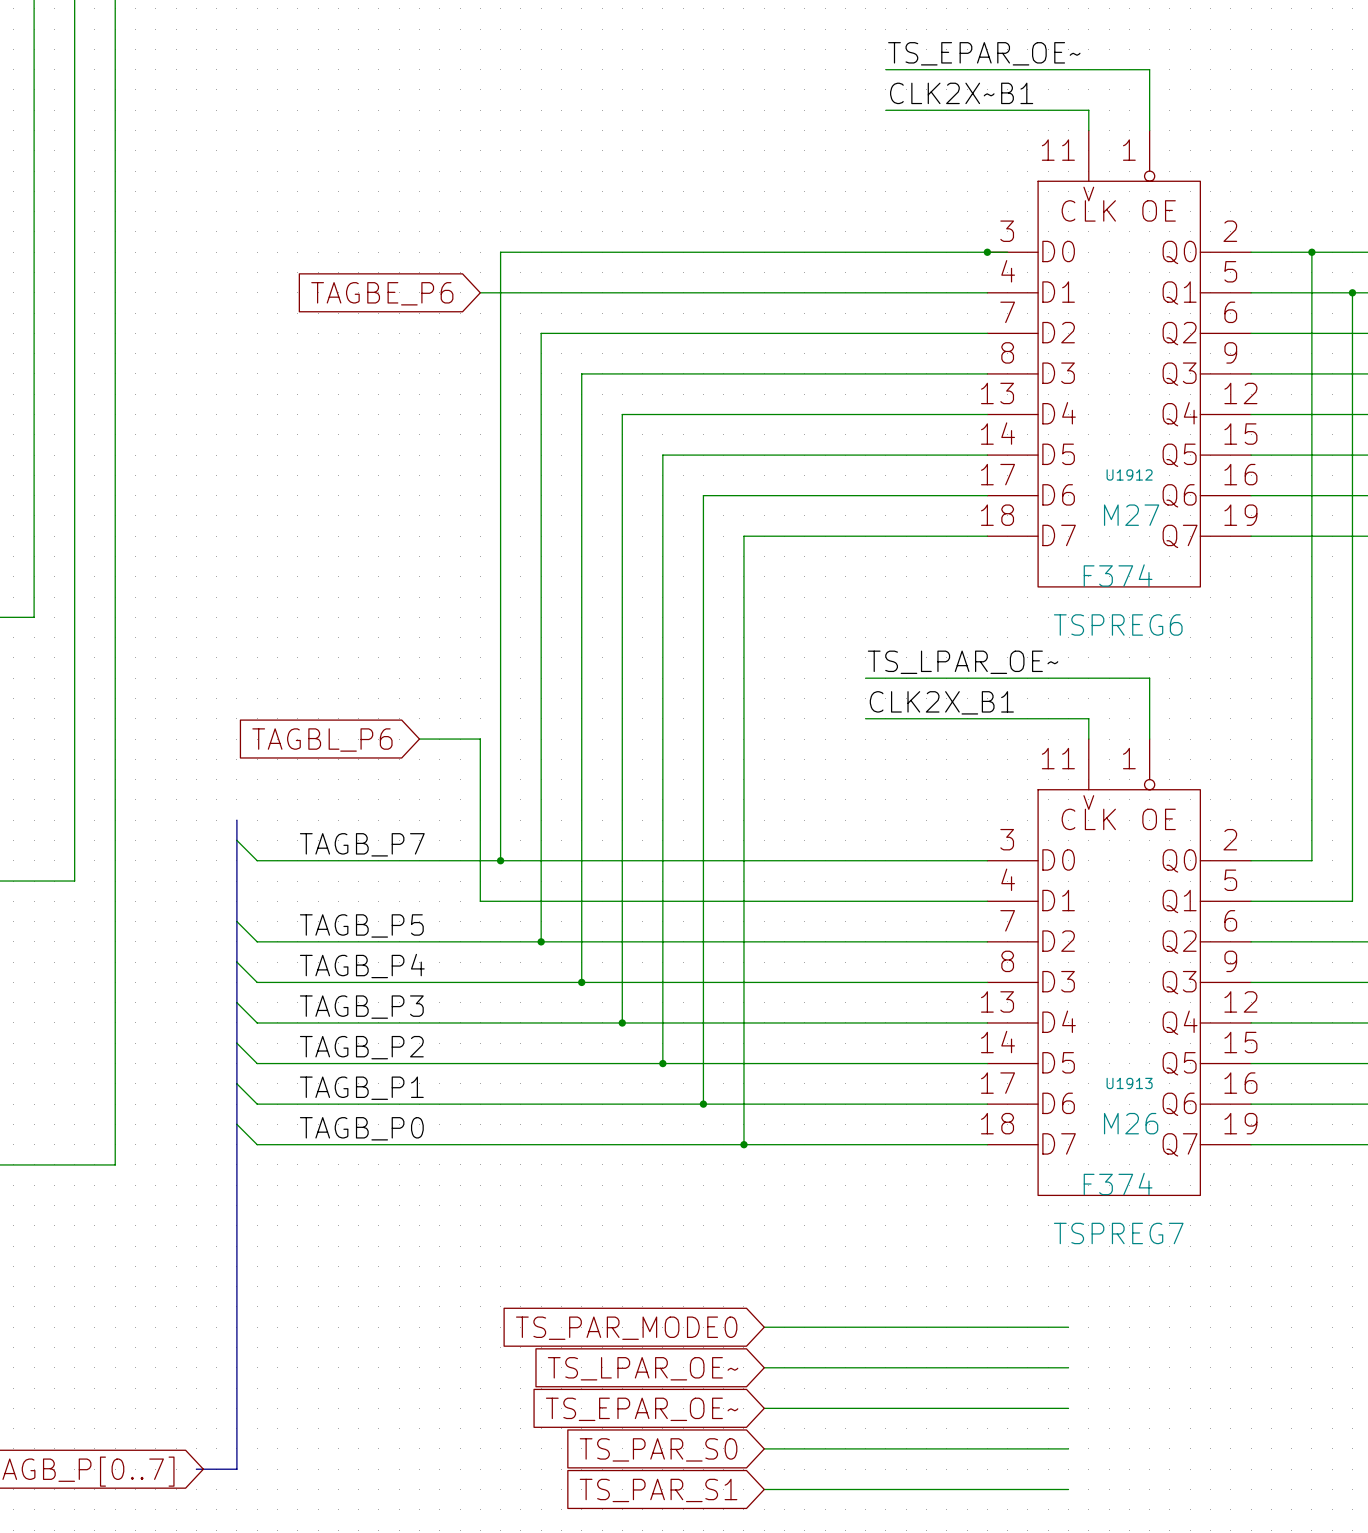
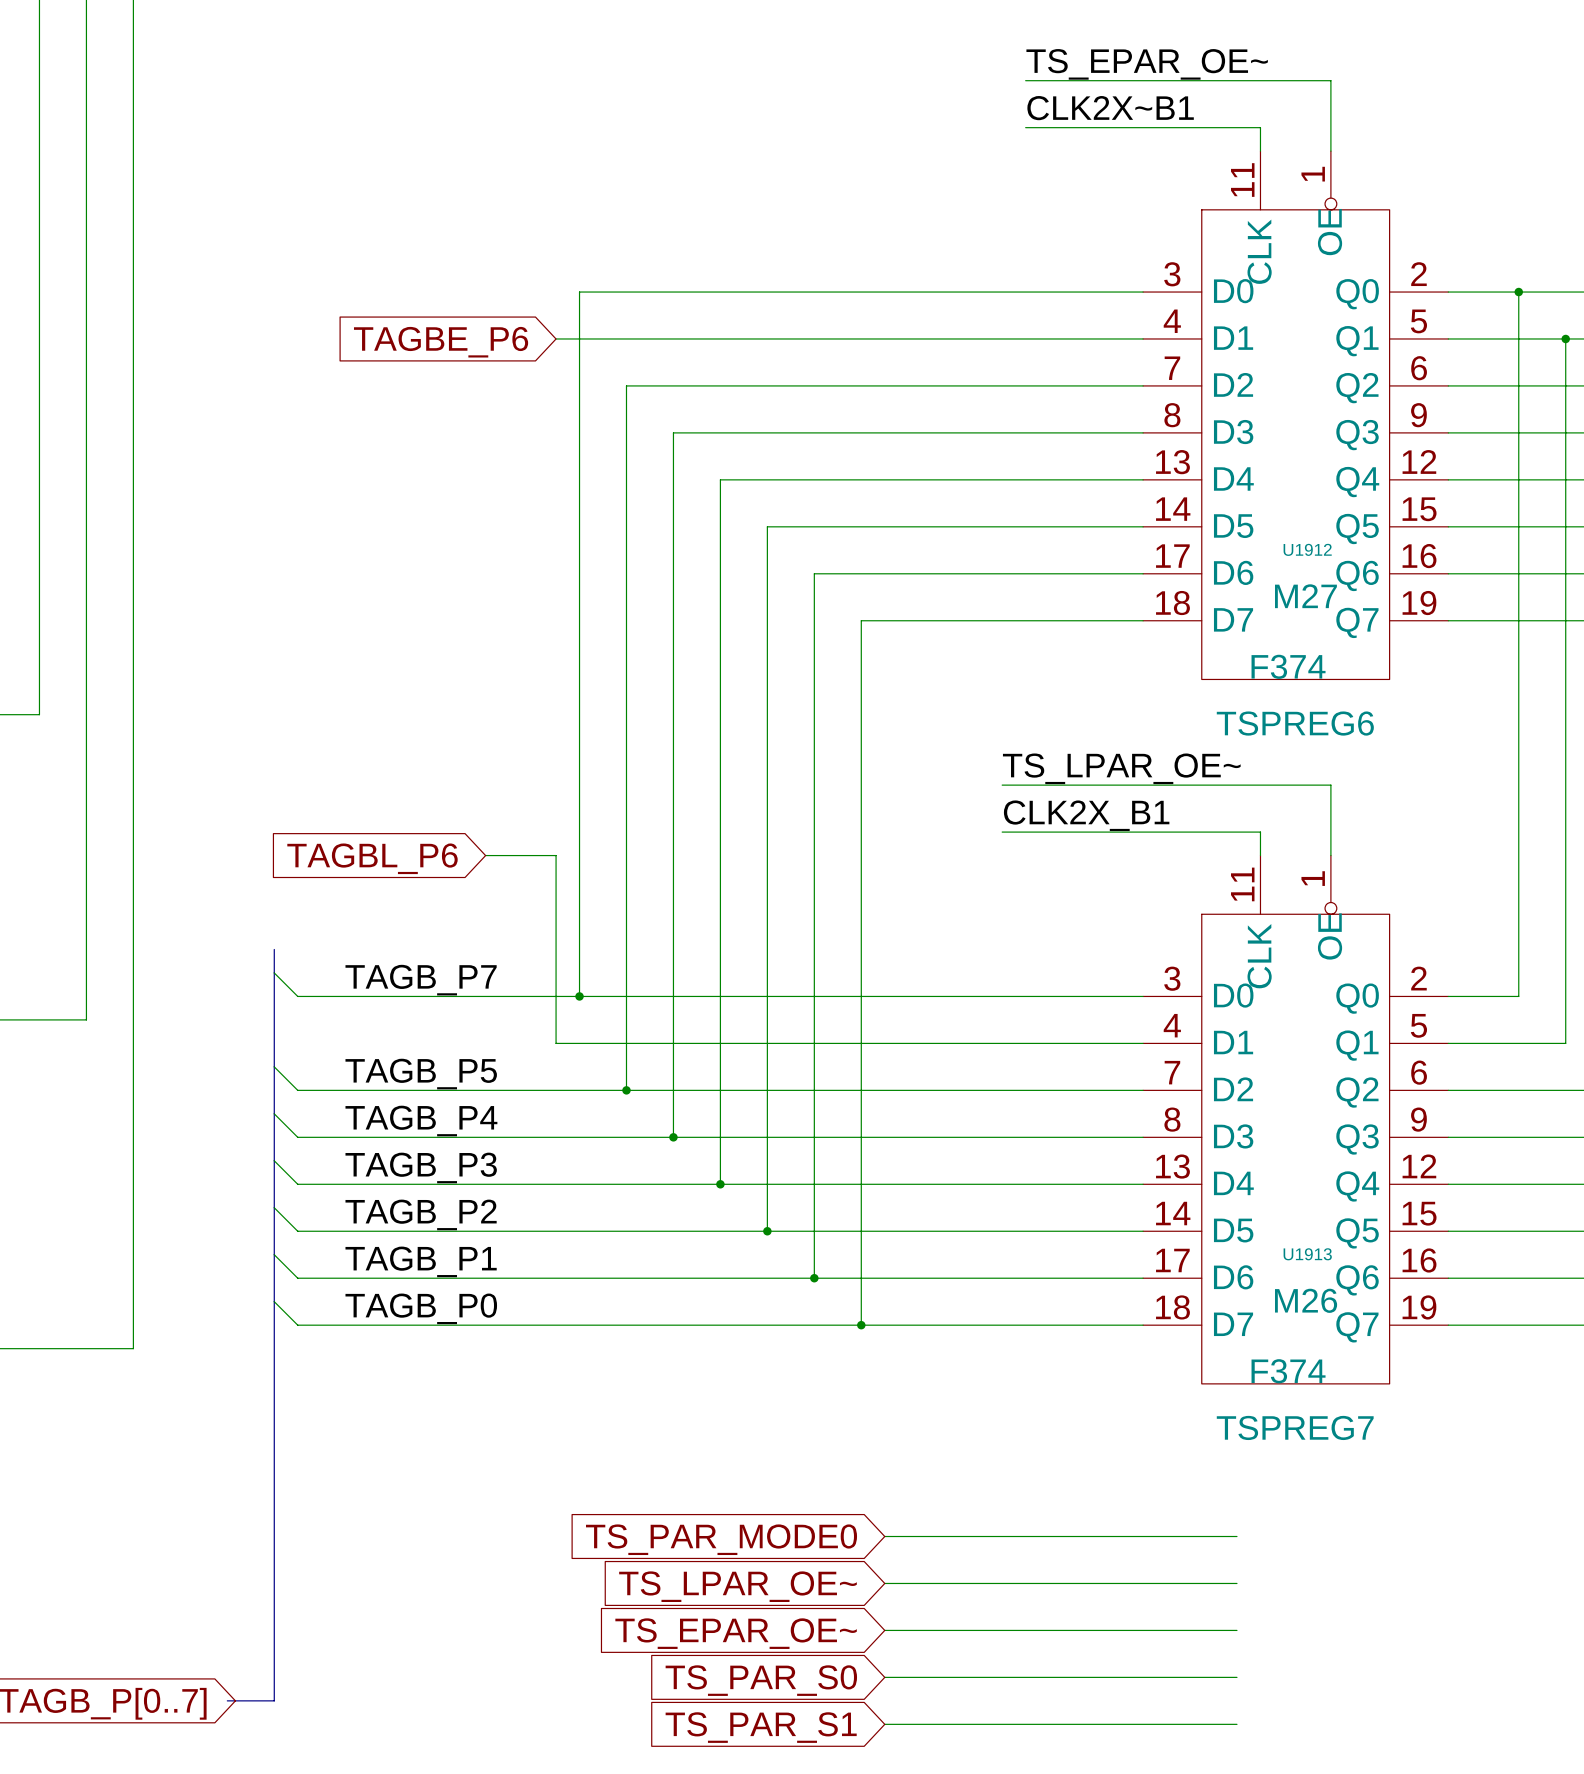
U1912 symbol: [987, 130, 1252, 587] -> [1143, 151, 1449, 680]
junction: (987, 252) -> none
U1913 symbol: [987, 739, 1252, 1196] -> [1143, 855, 1449, 1384]

